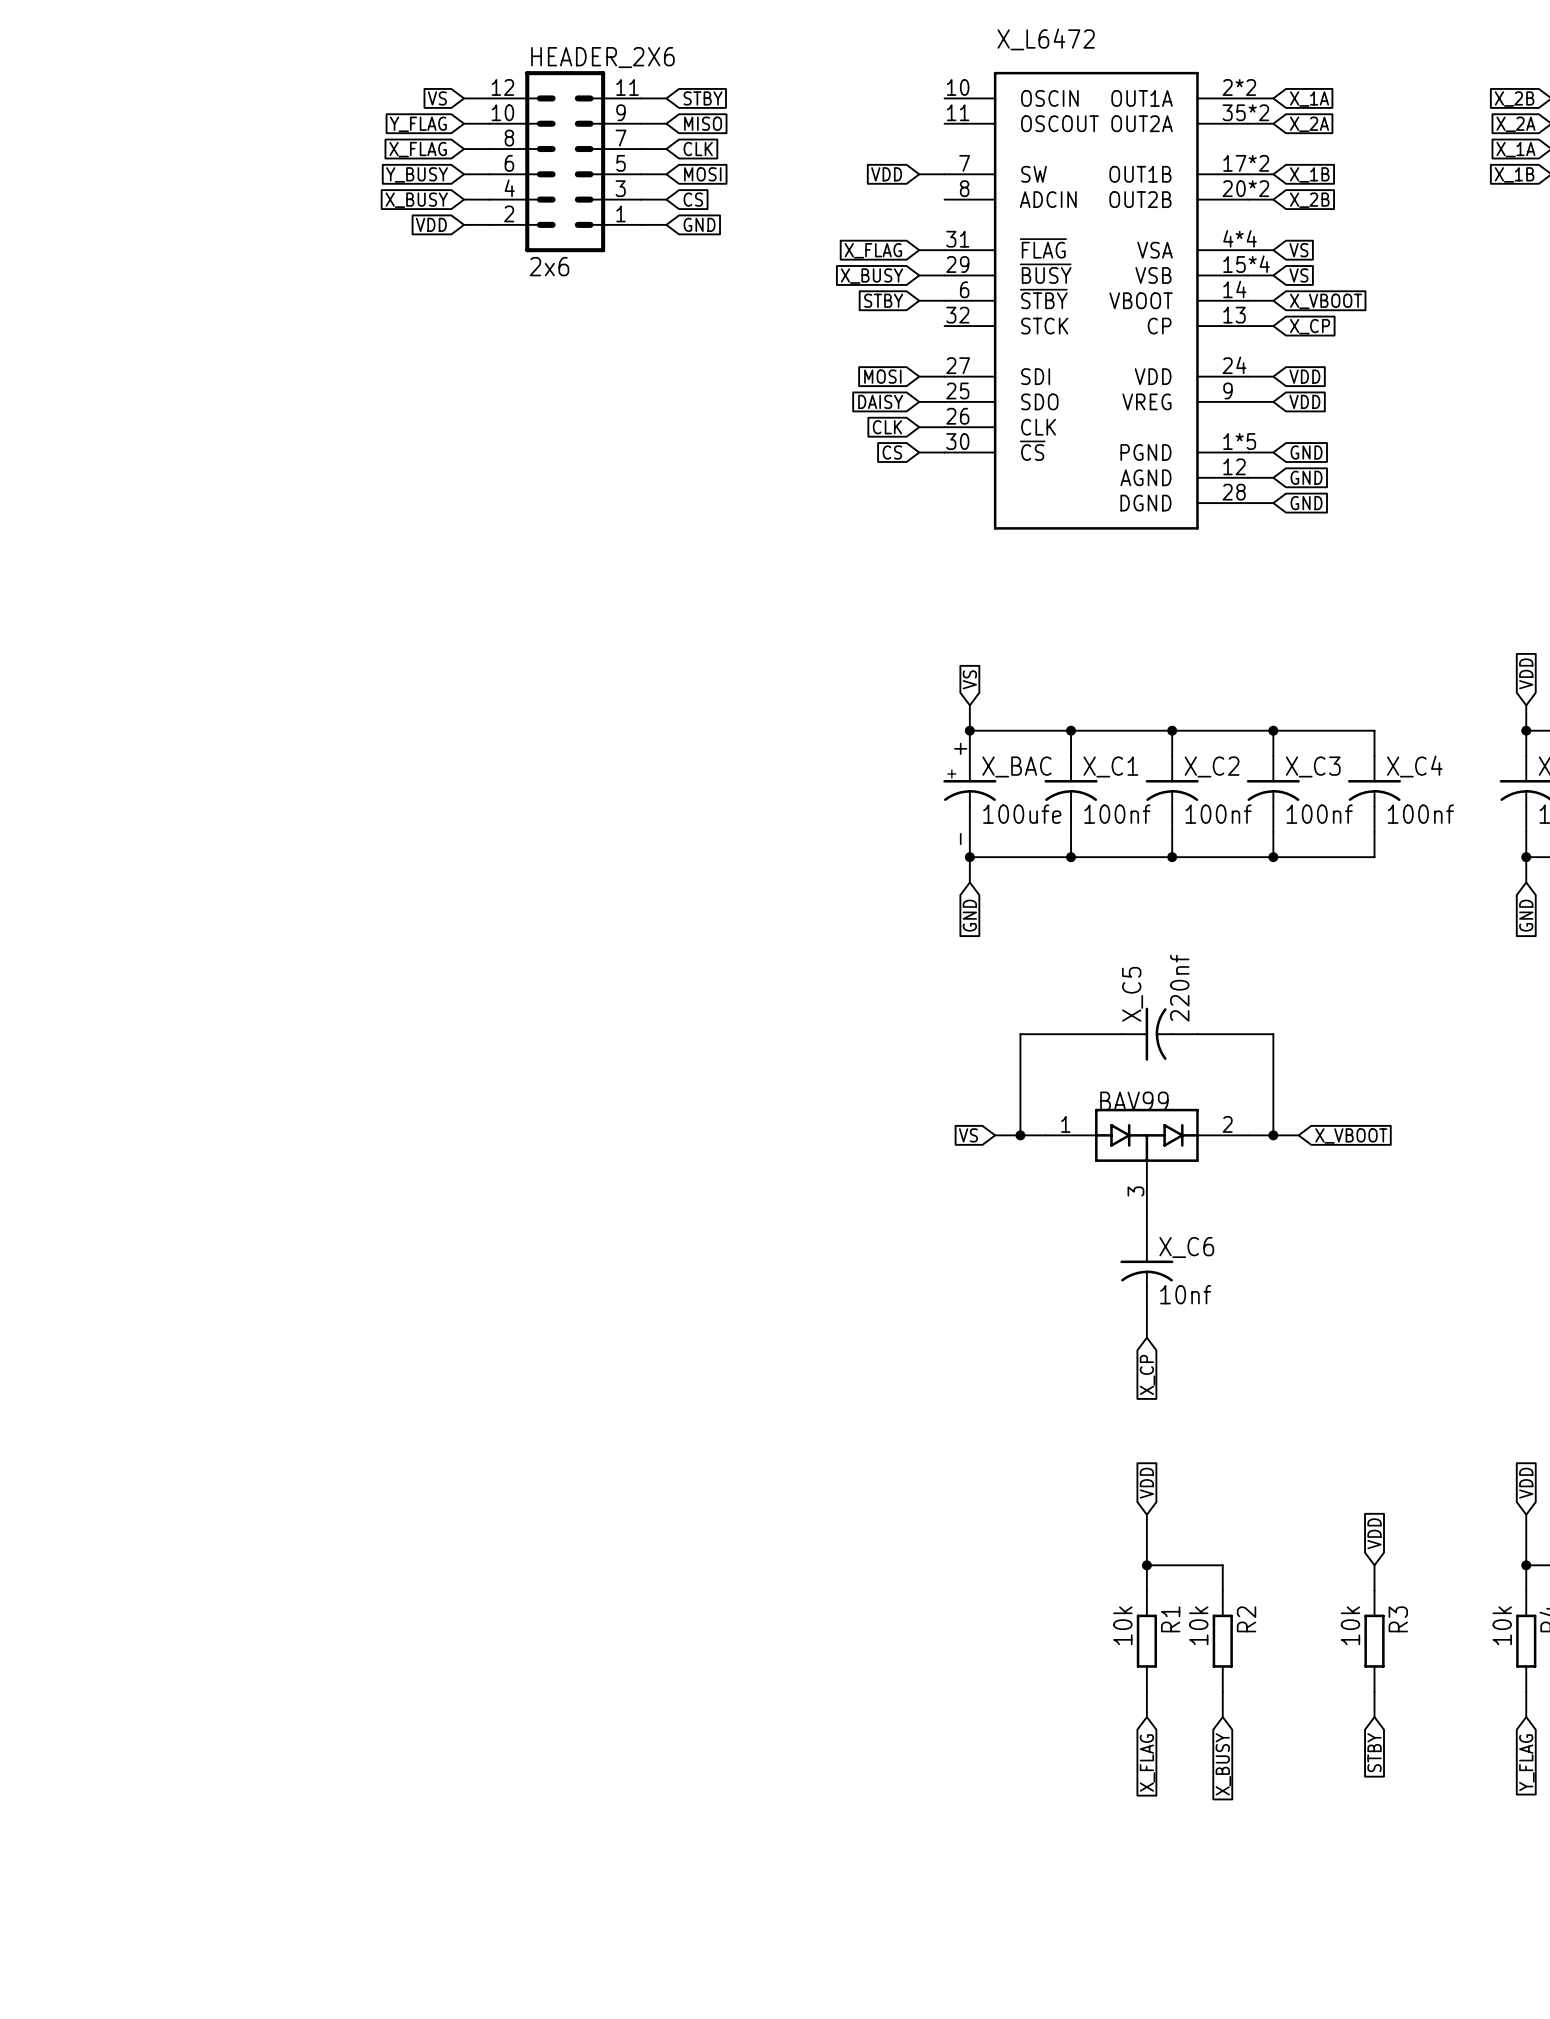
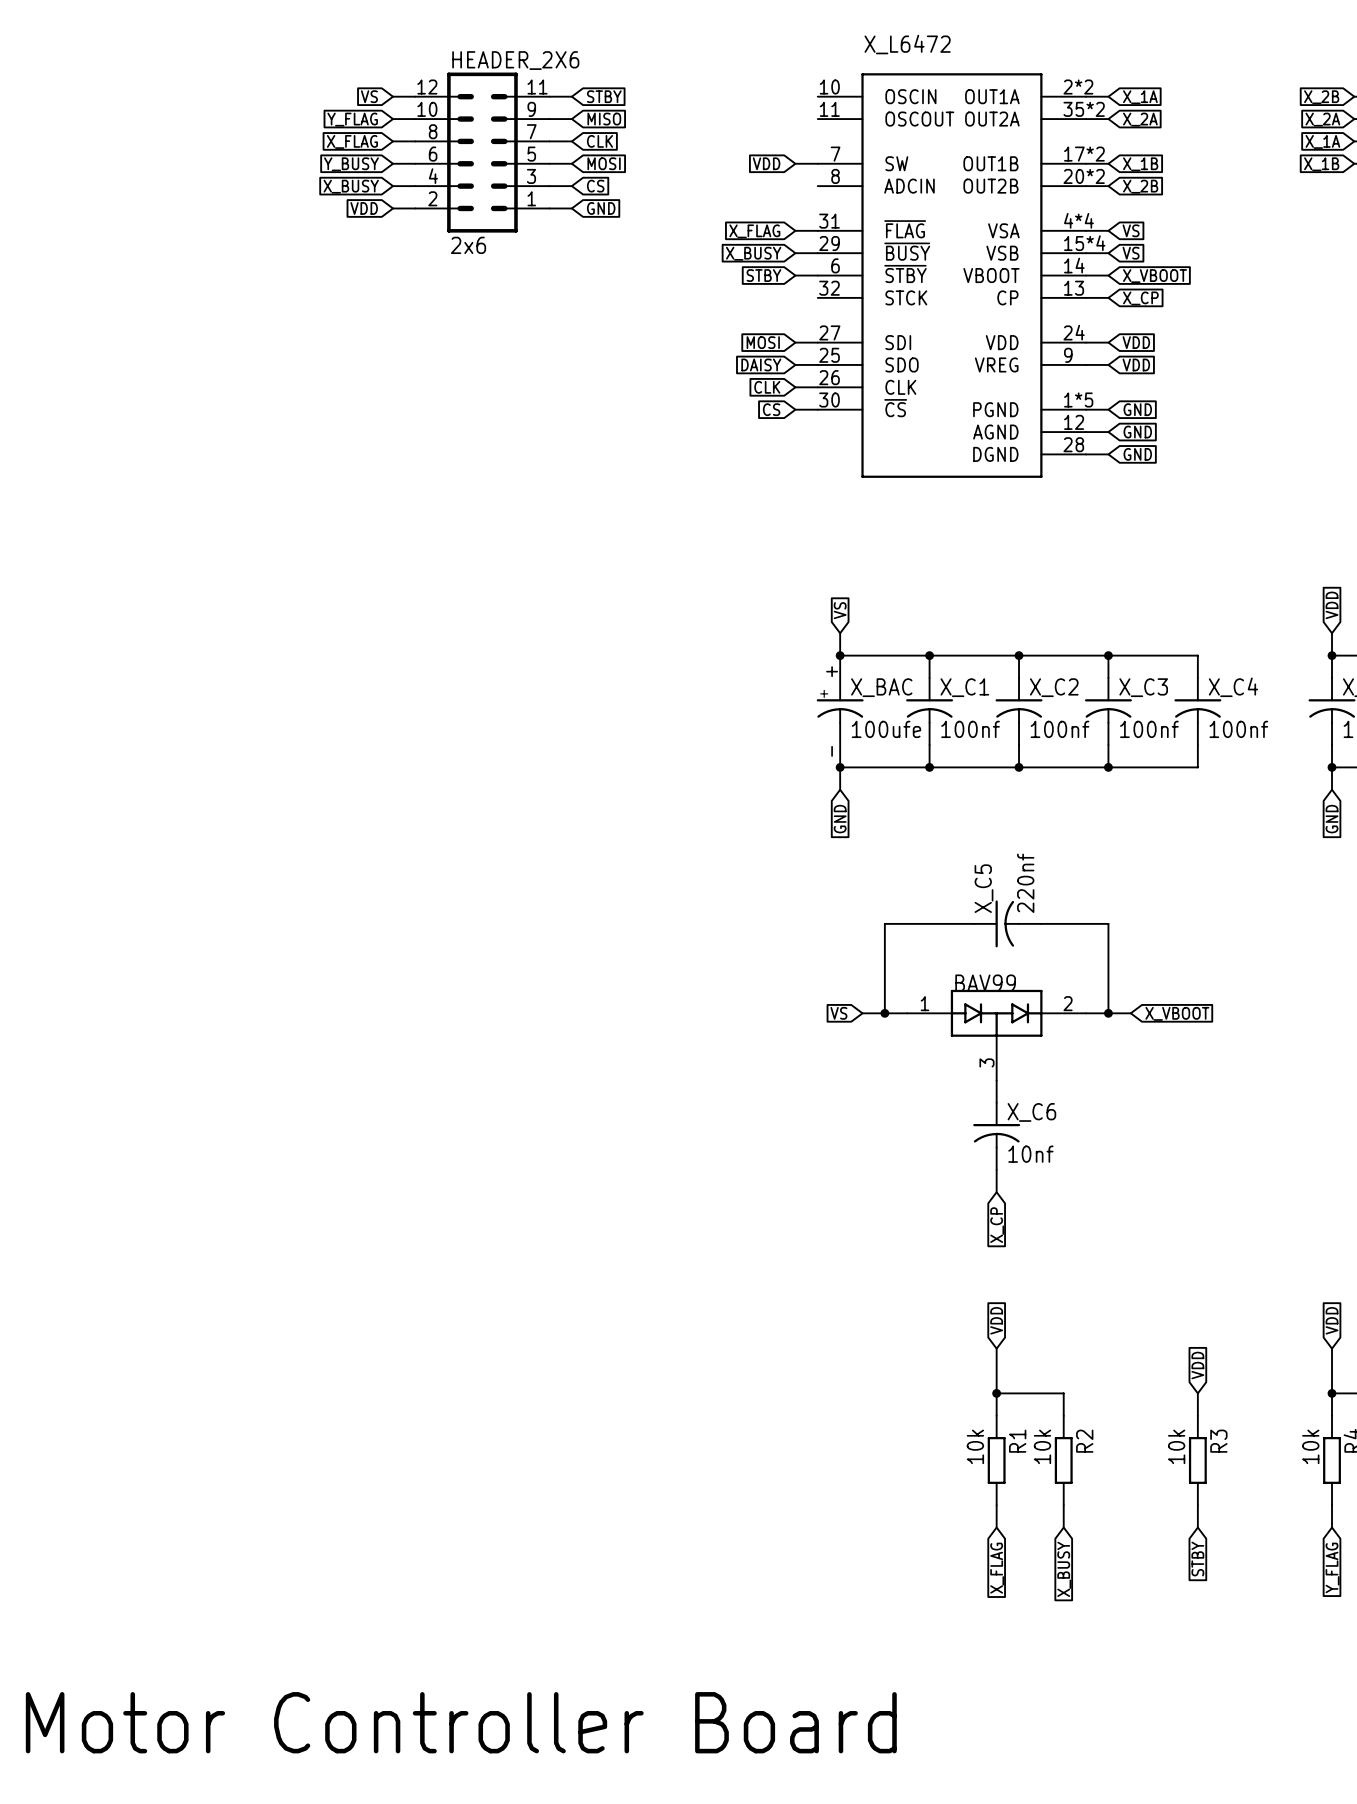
text: none -> Motor Controller Board (461, 1722)

